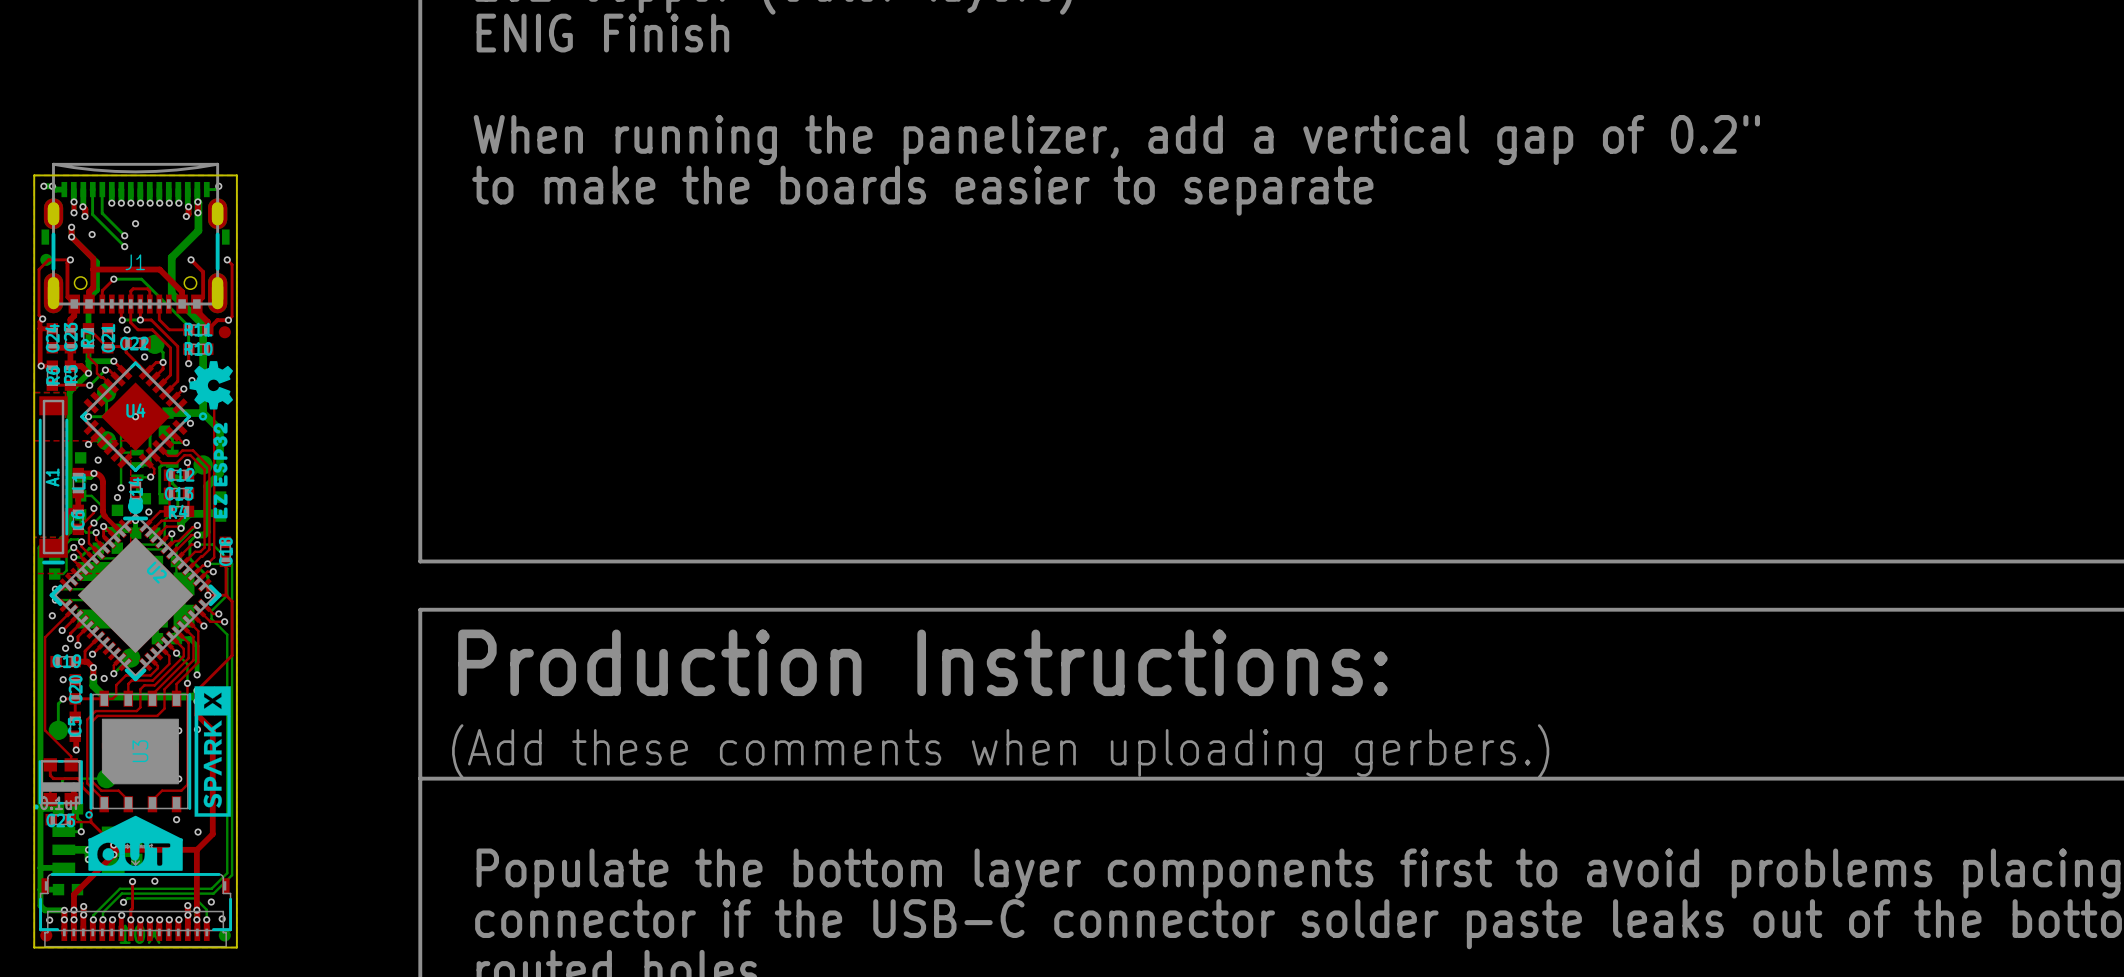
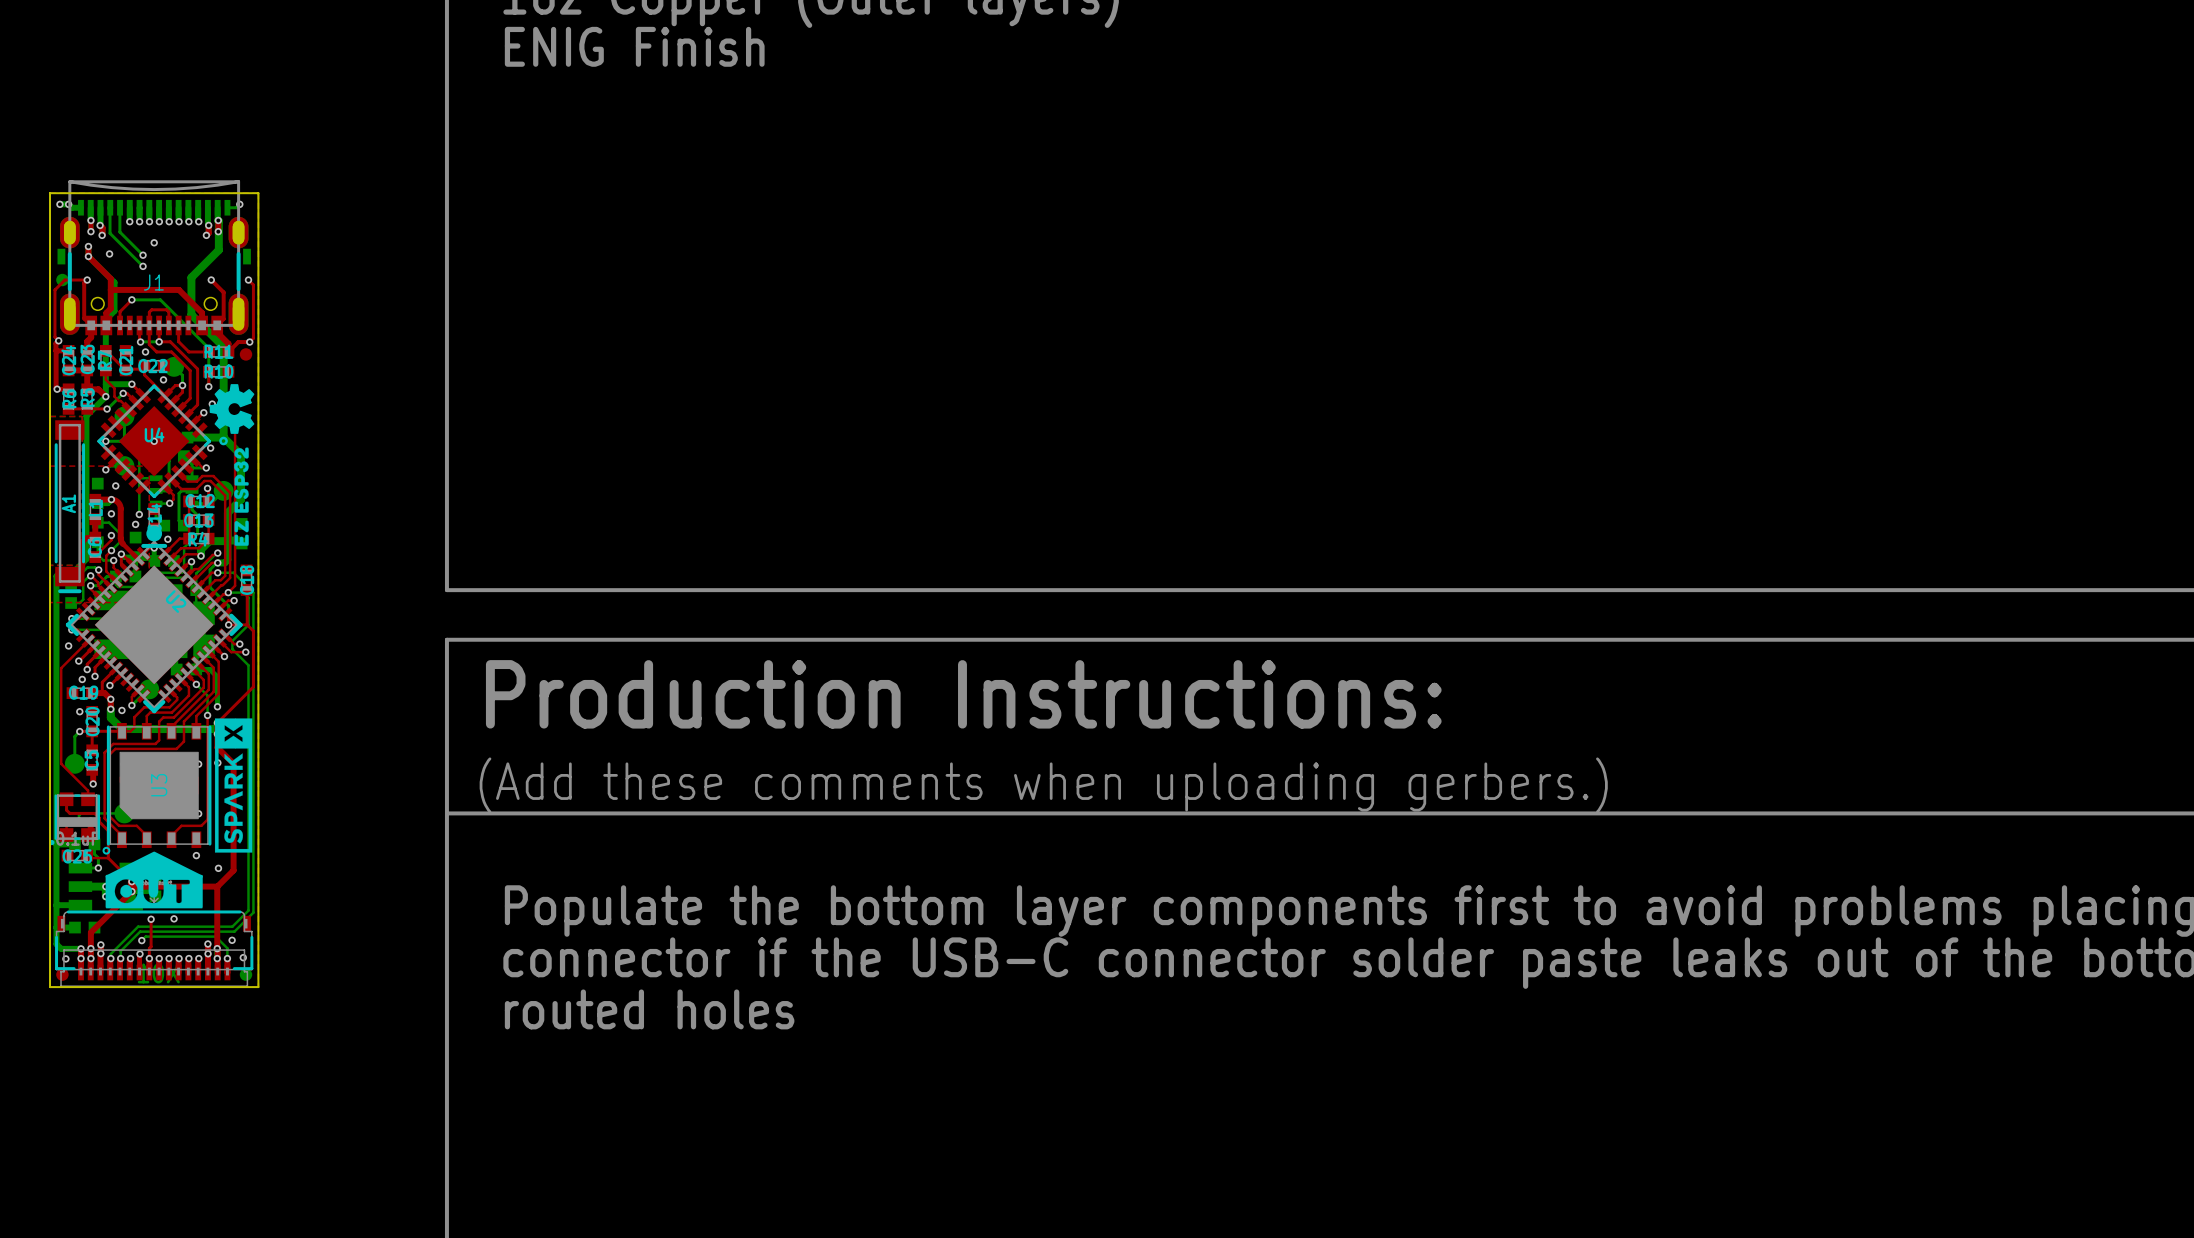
text: When running the panelizer, add a vertical gap of 0.2" (1116, 140) -> none
text: to make the boards easier to separate (922, 190) -> none

